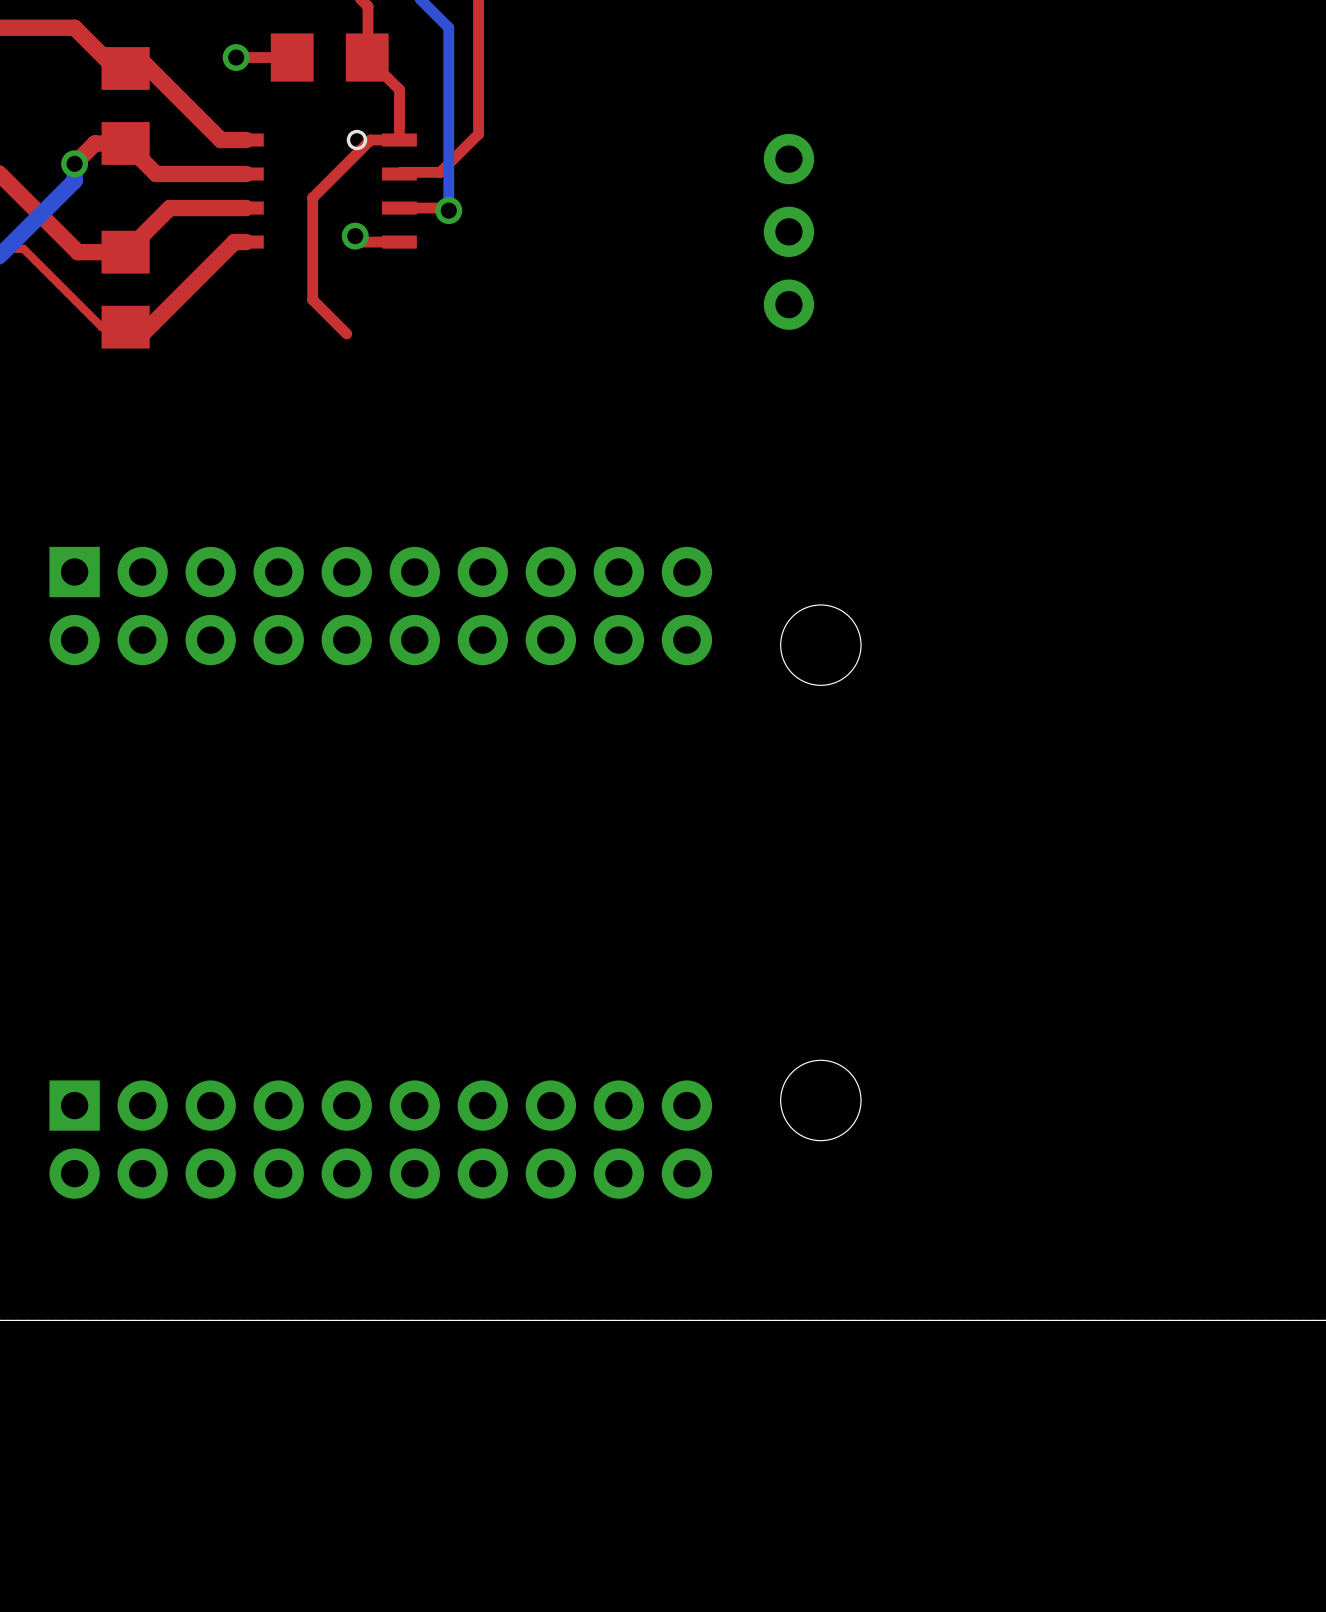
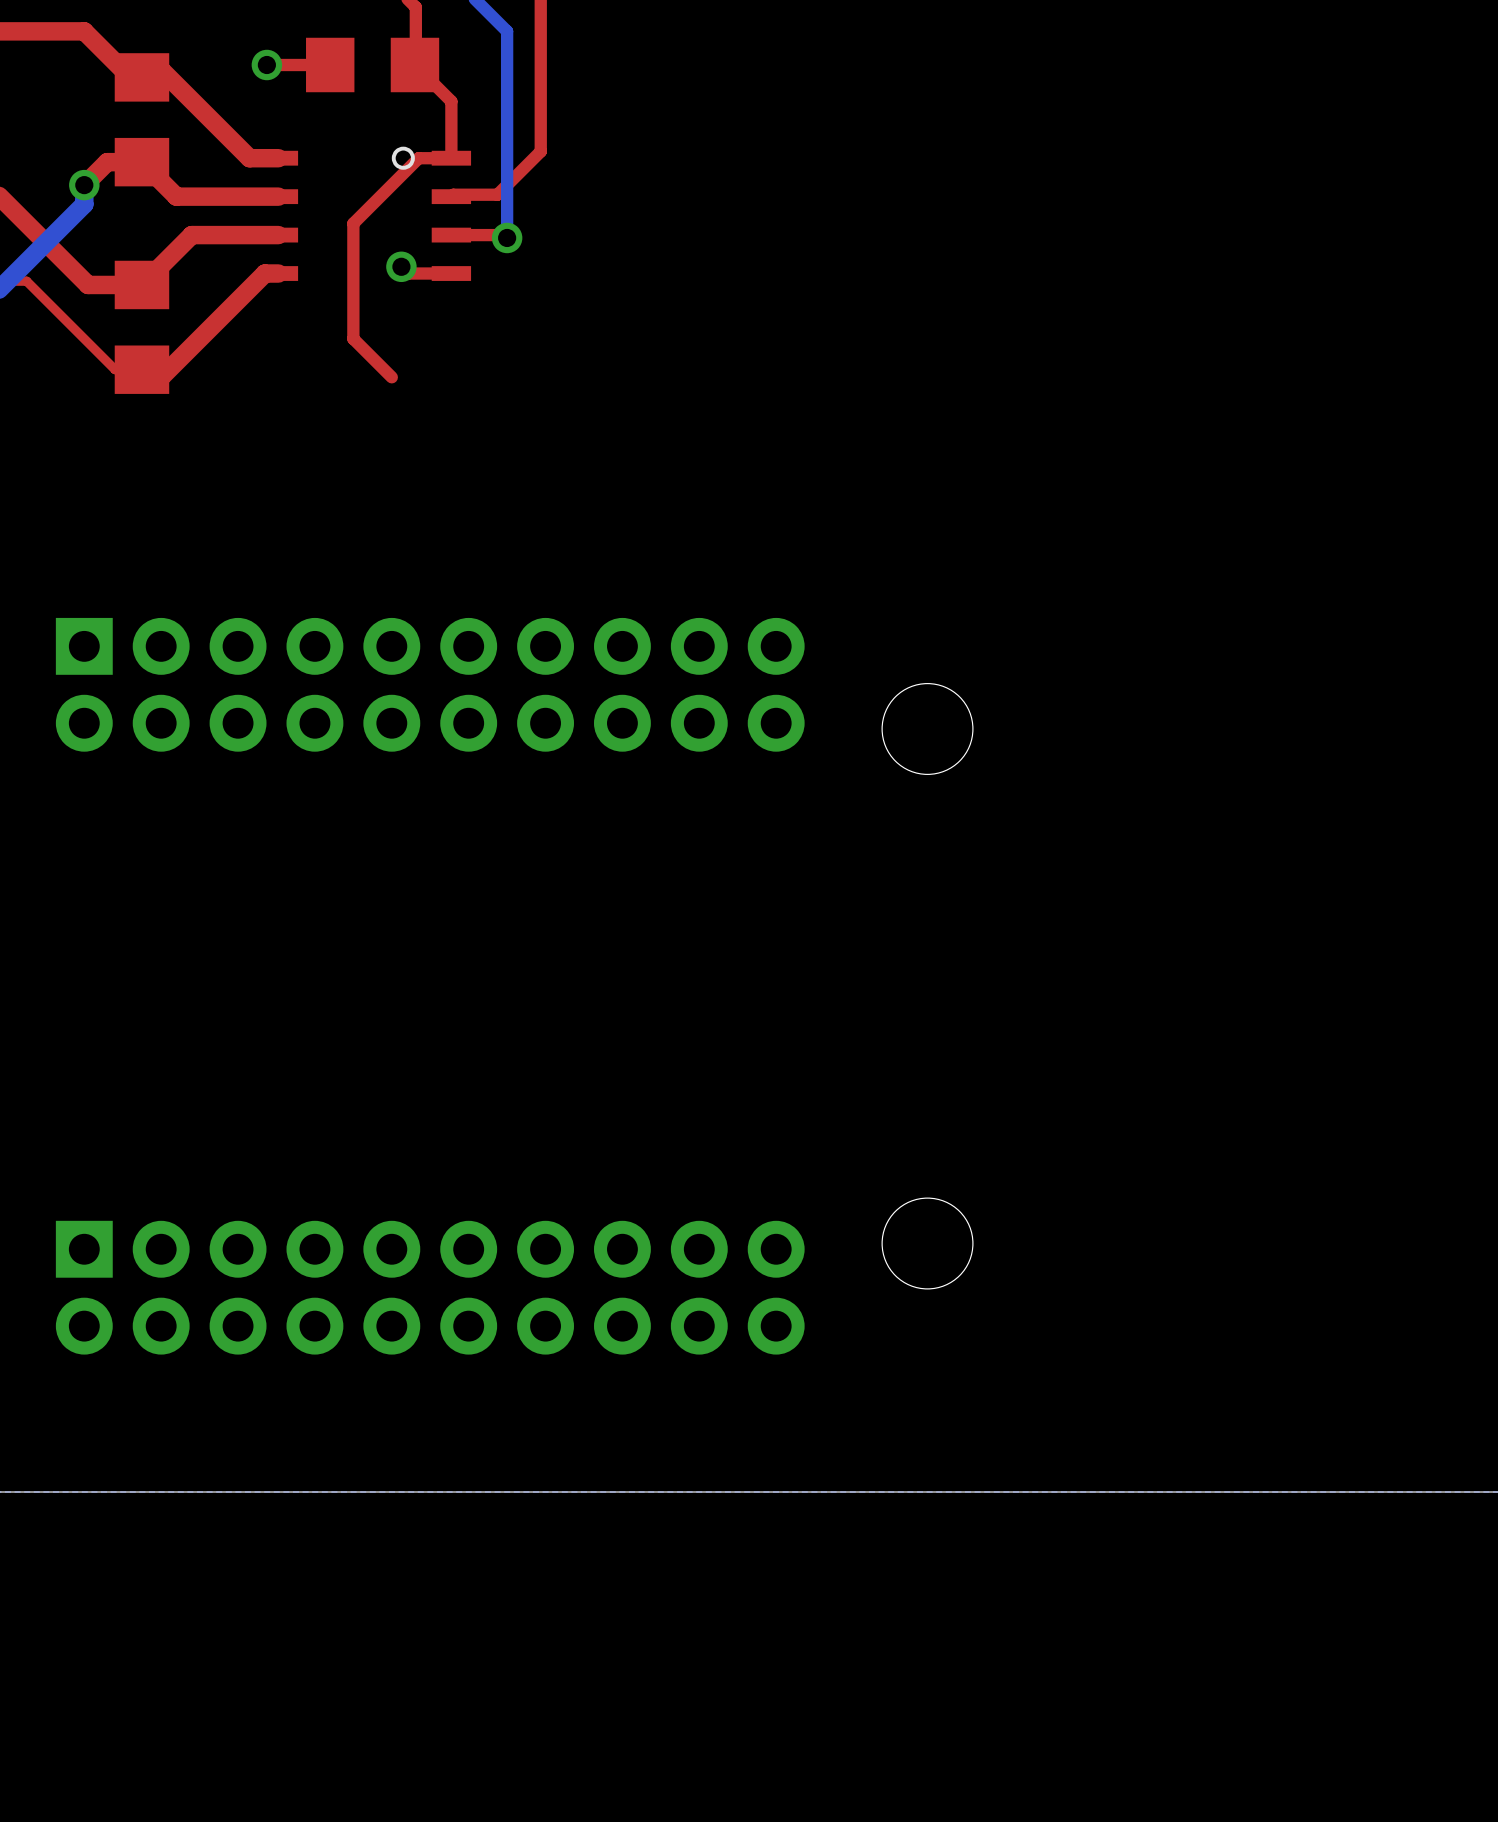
part: (788, 231) -> none

